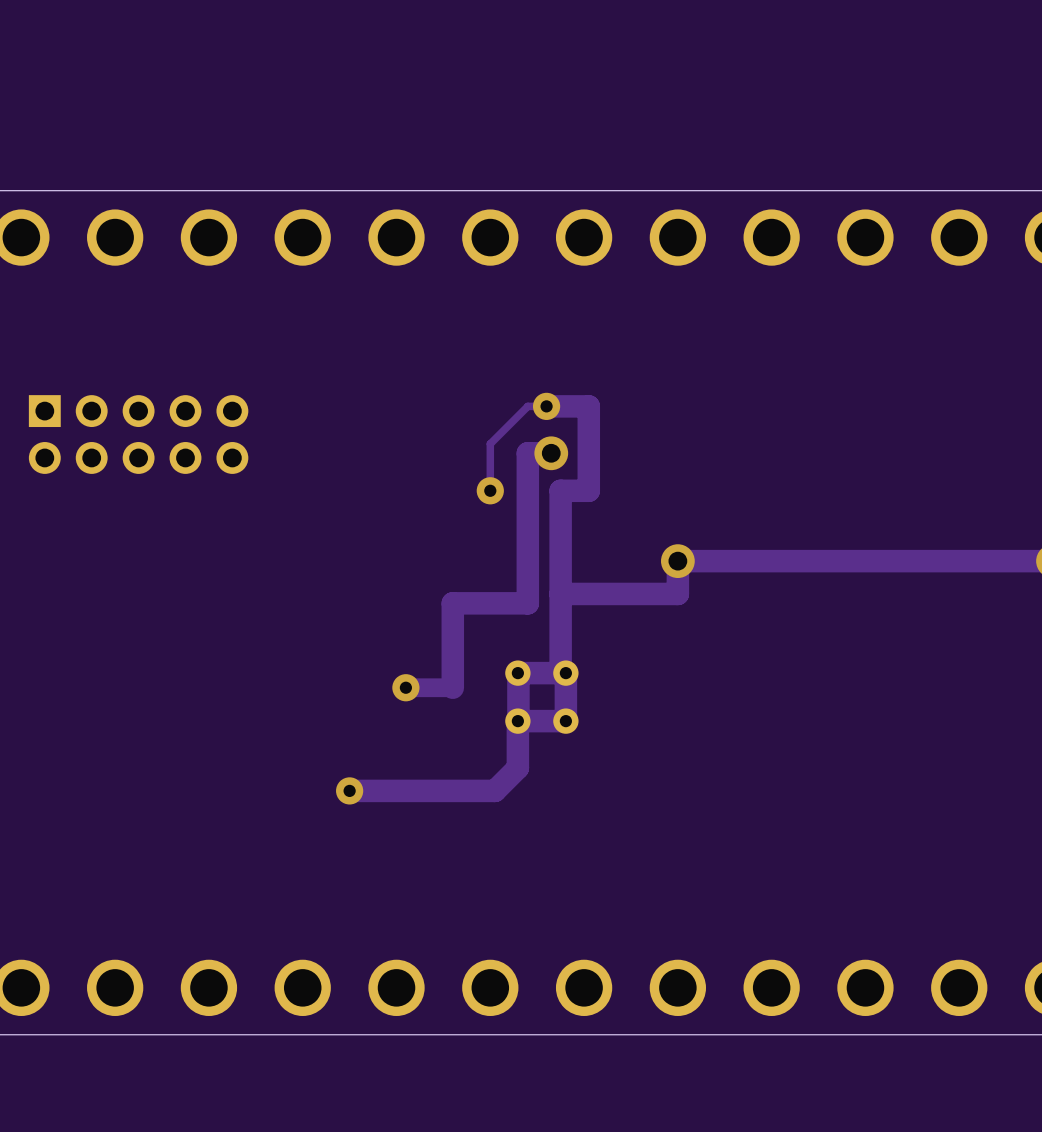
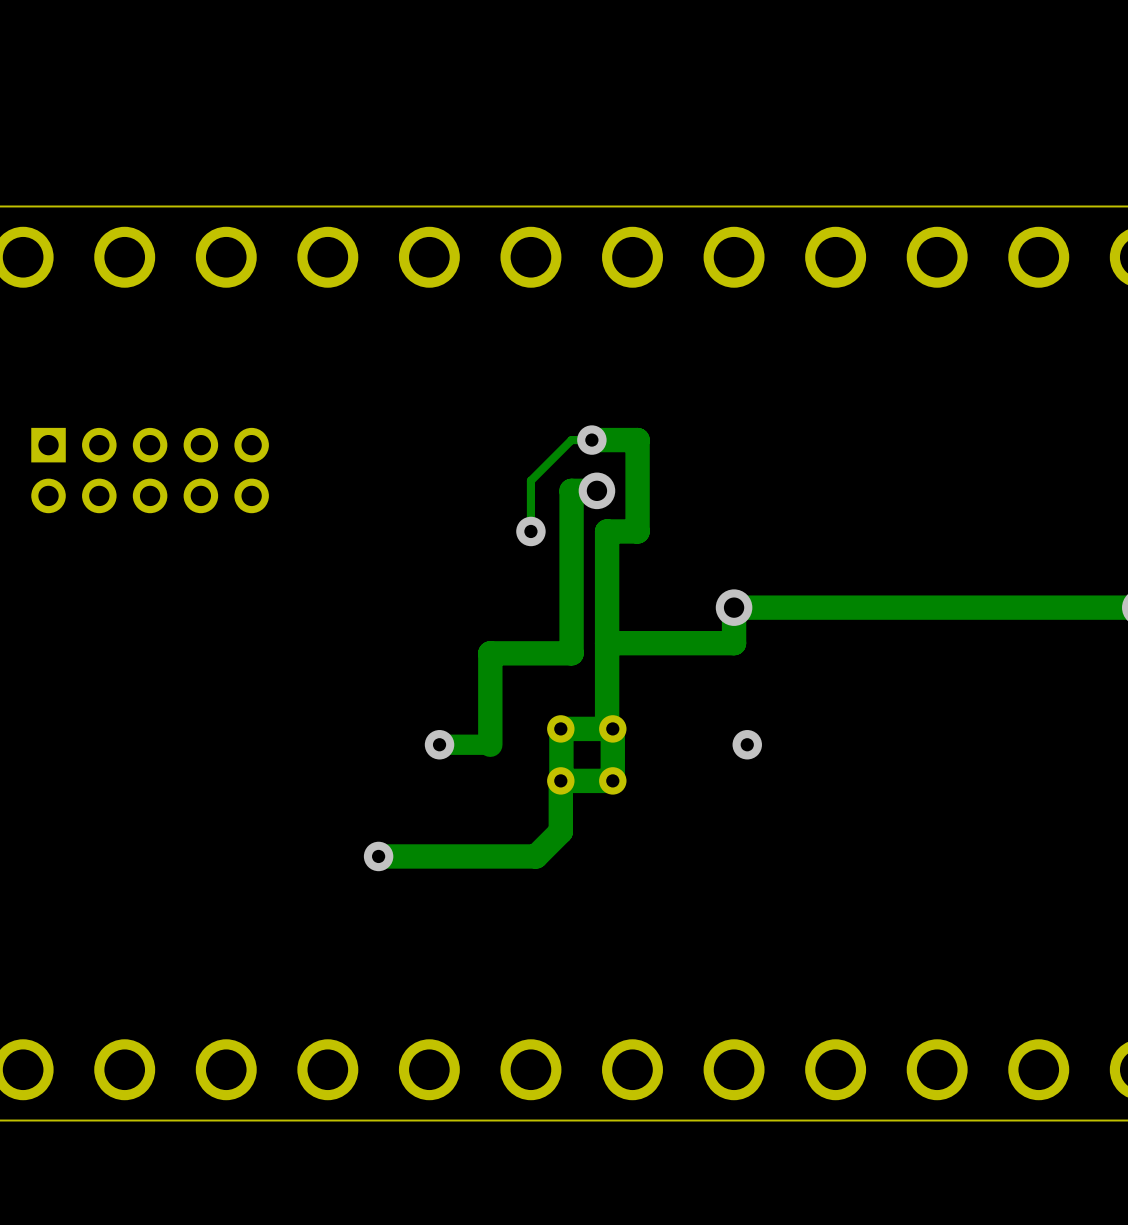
via: none -> (747, 744)

